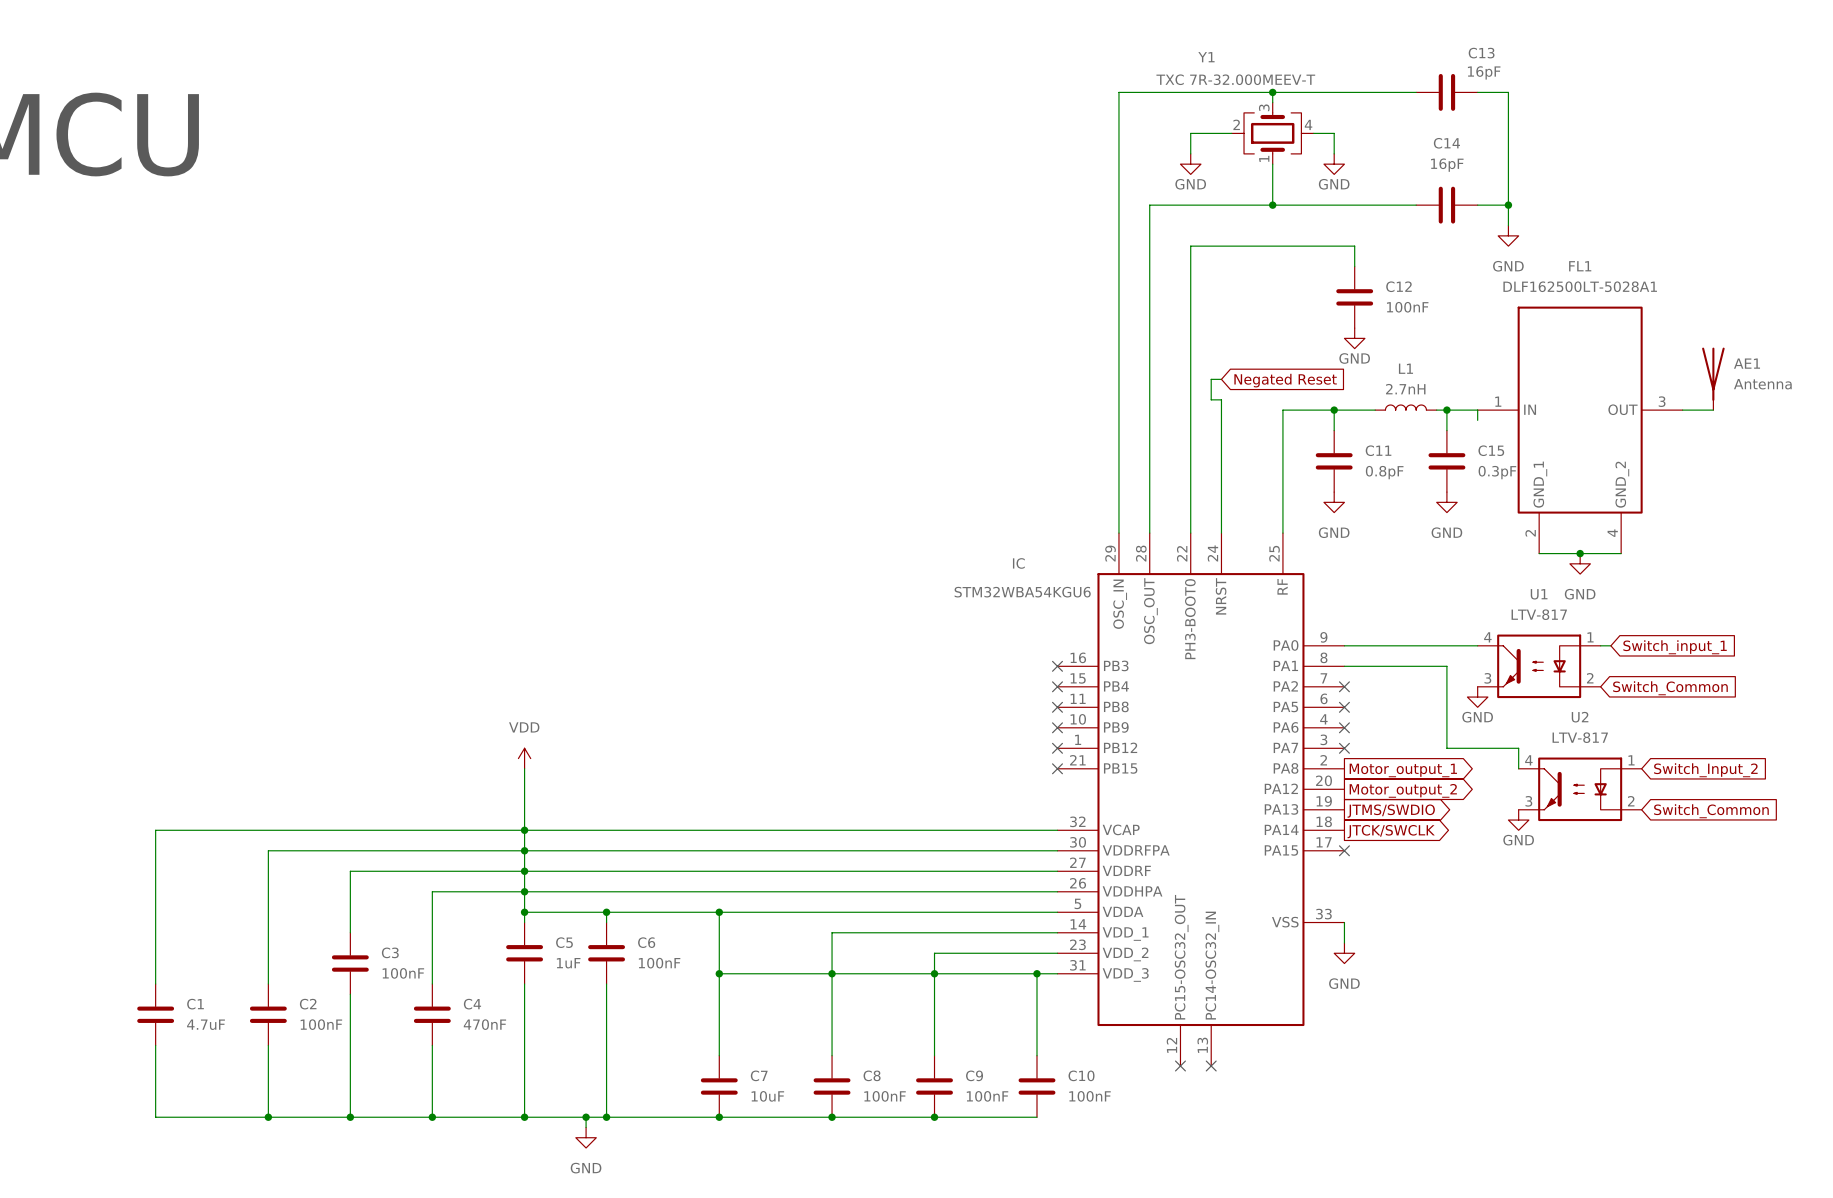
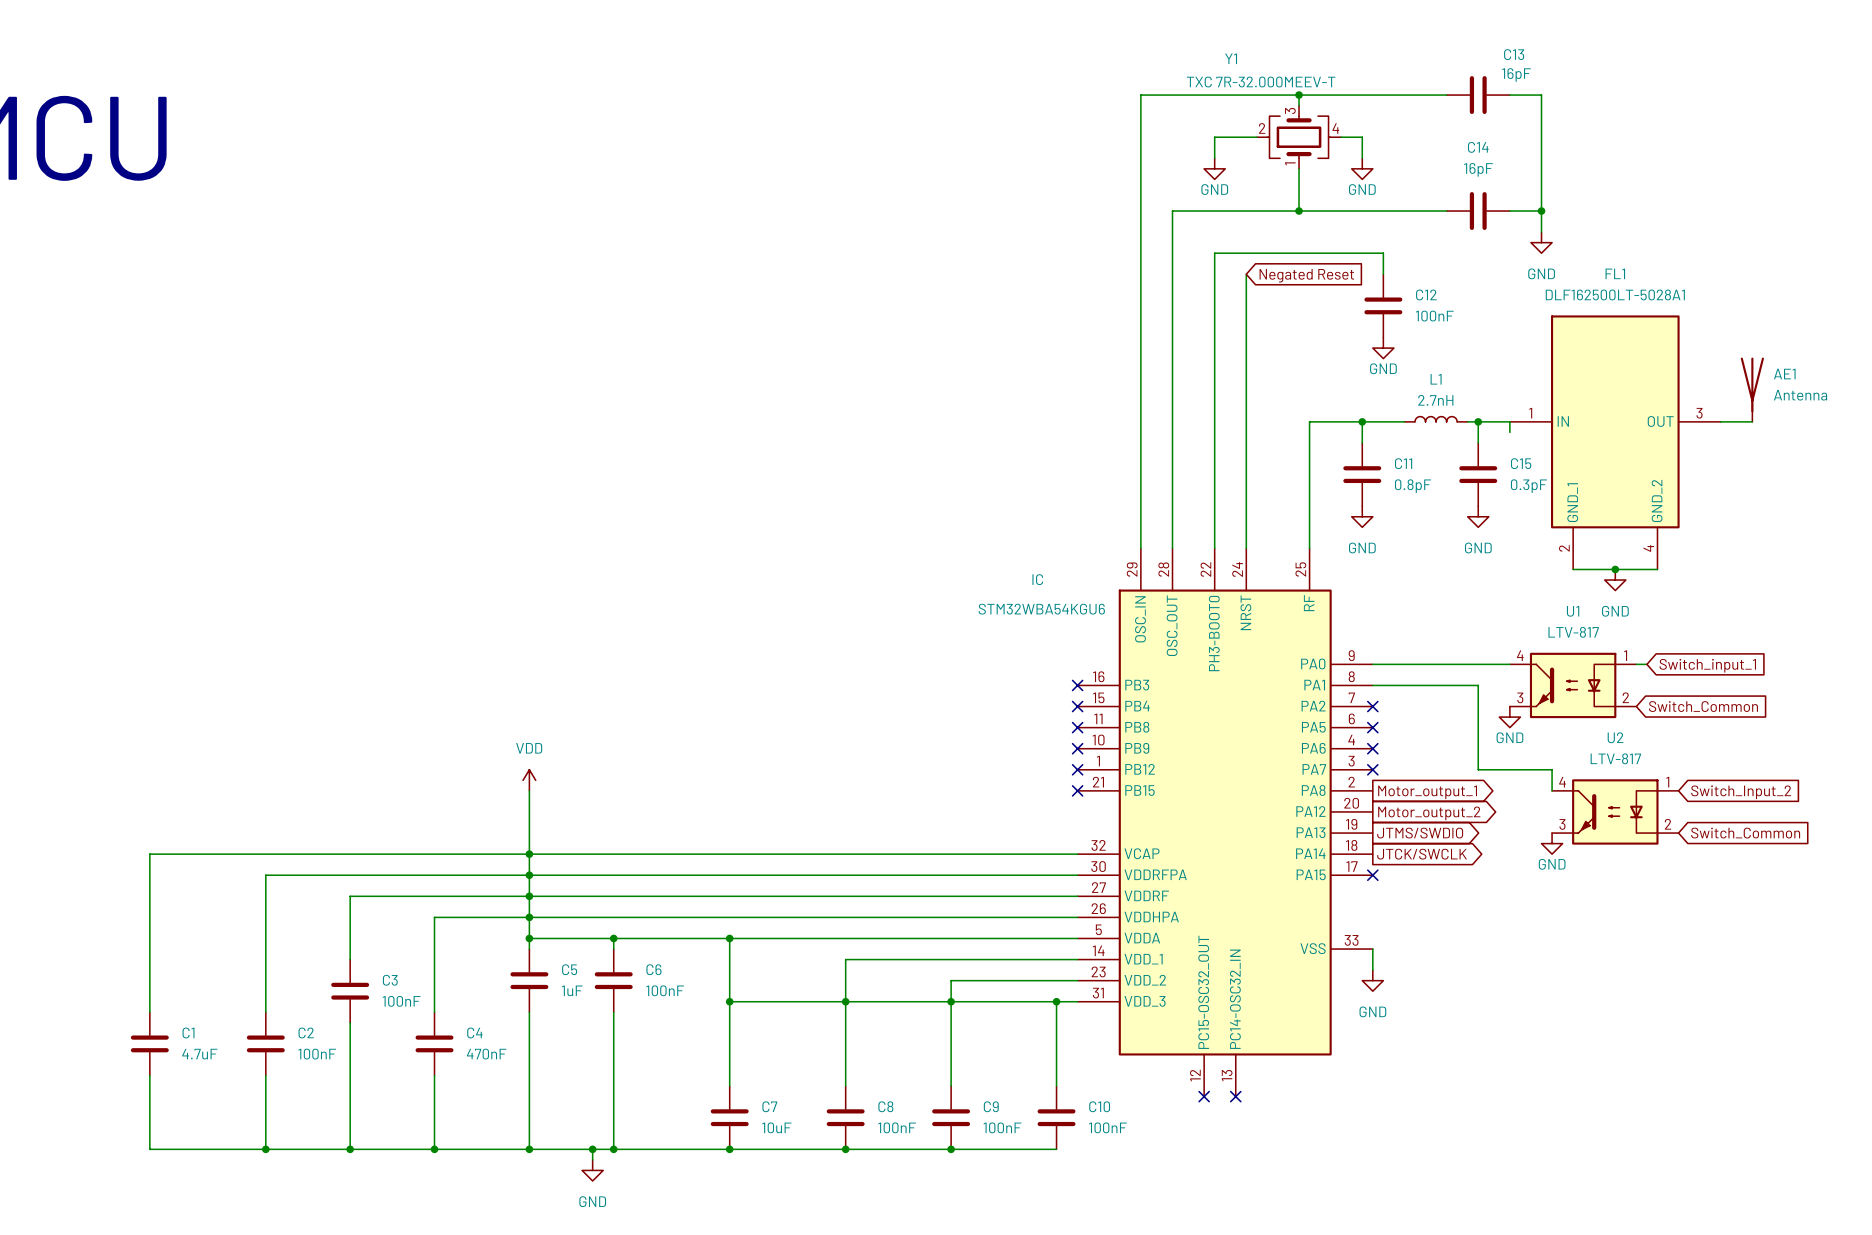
wire: (1221, 379) (1211, 379) (1211, 399) (1221, 399) -> (1246, 274) (1246, 411)
global label position: Negated Reset (1285, 380) -> Negated Reset (1306, 275)

